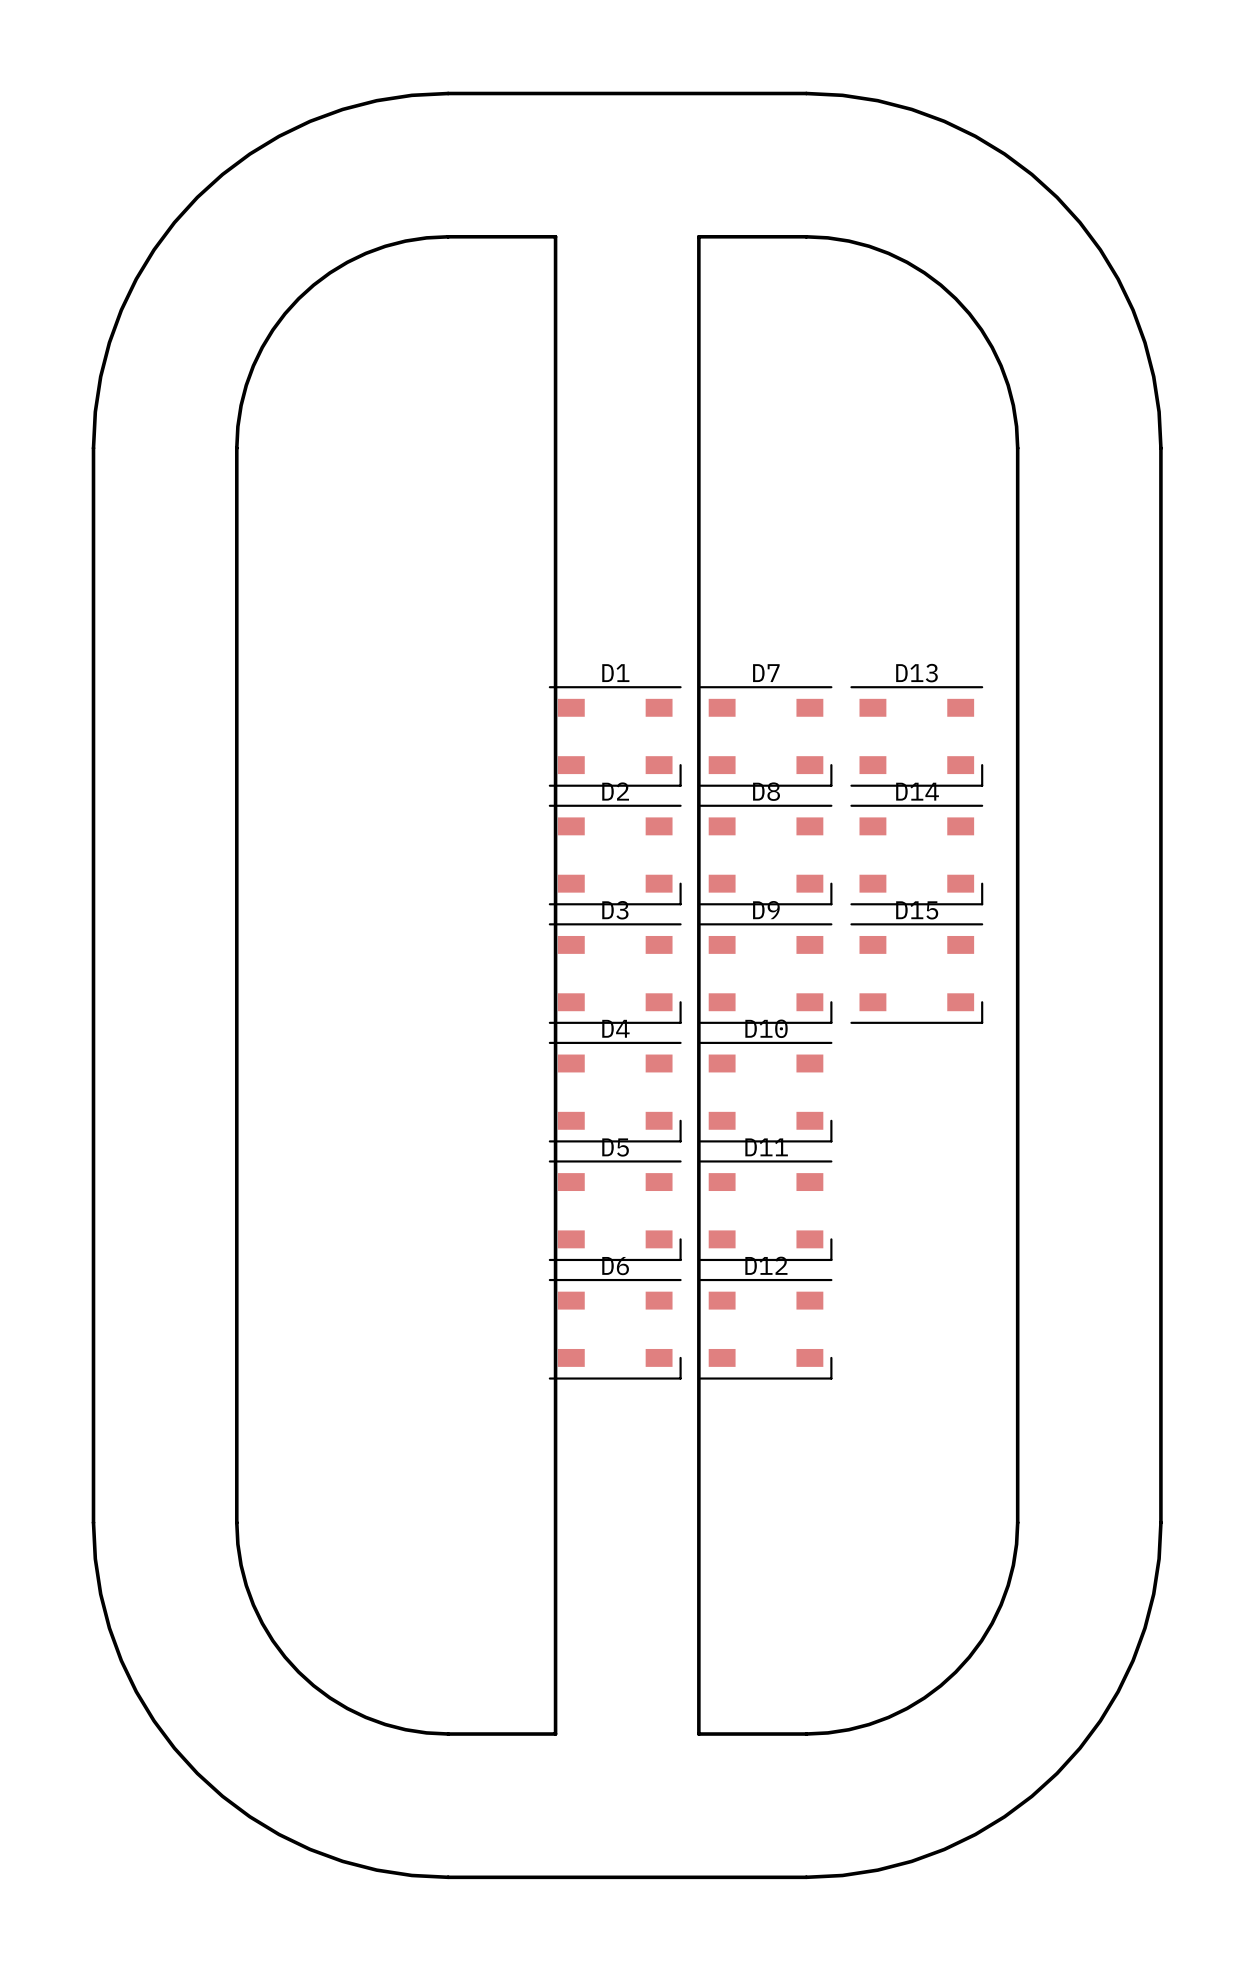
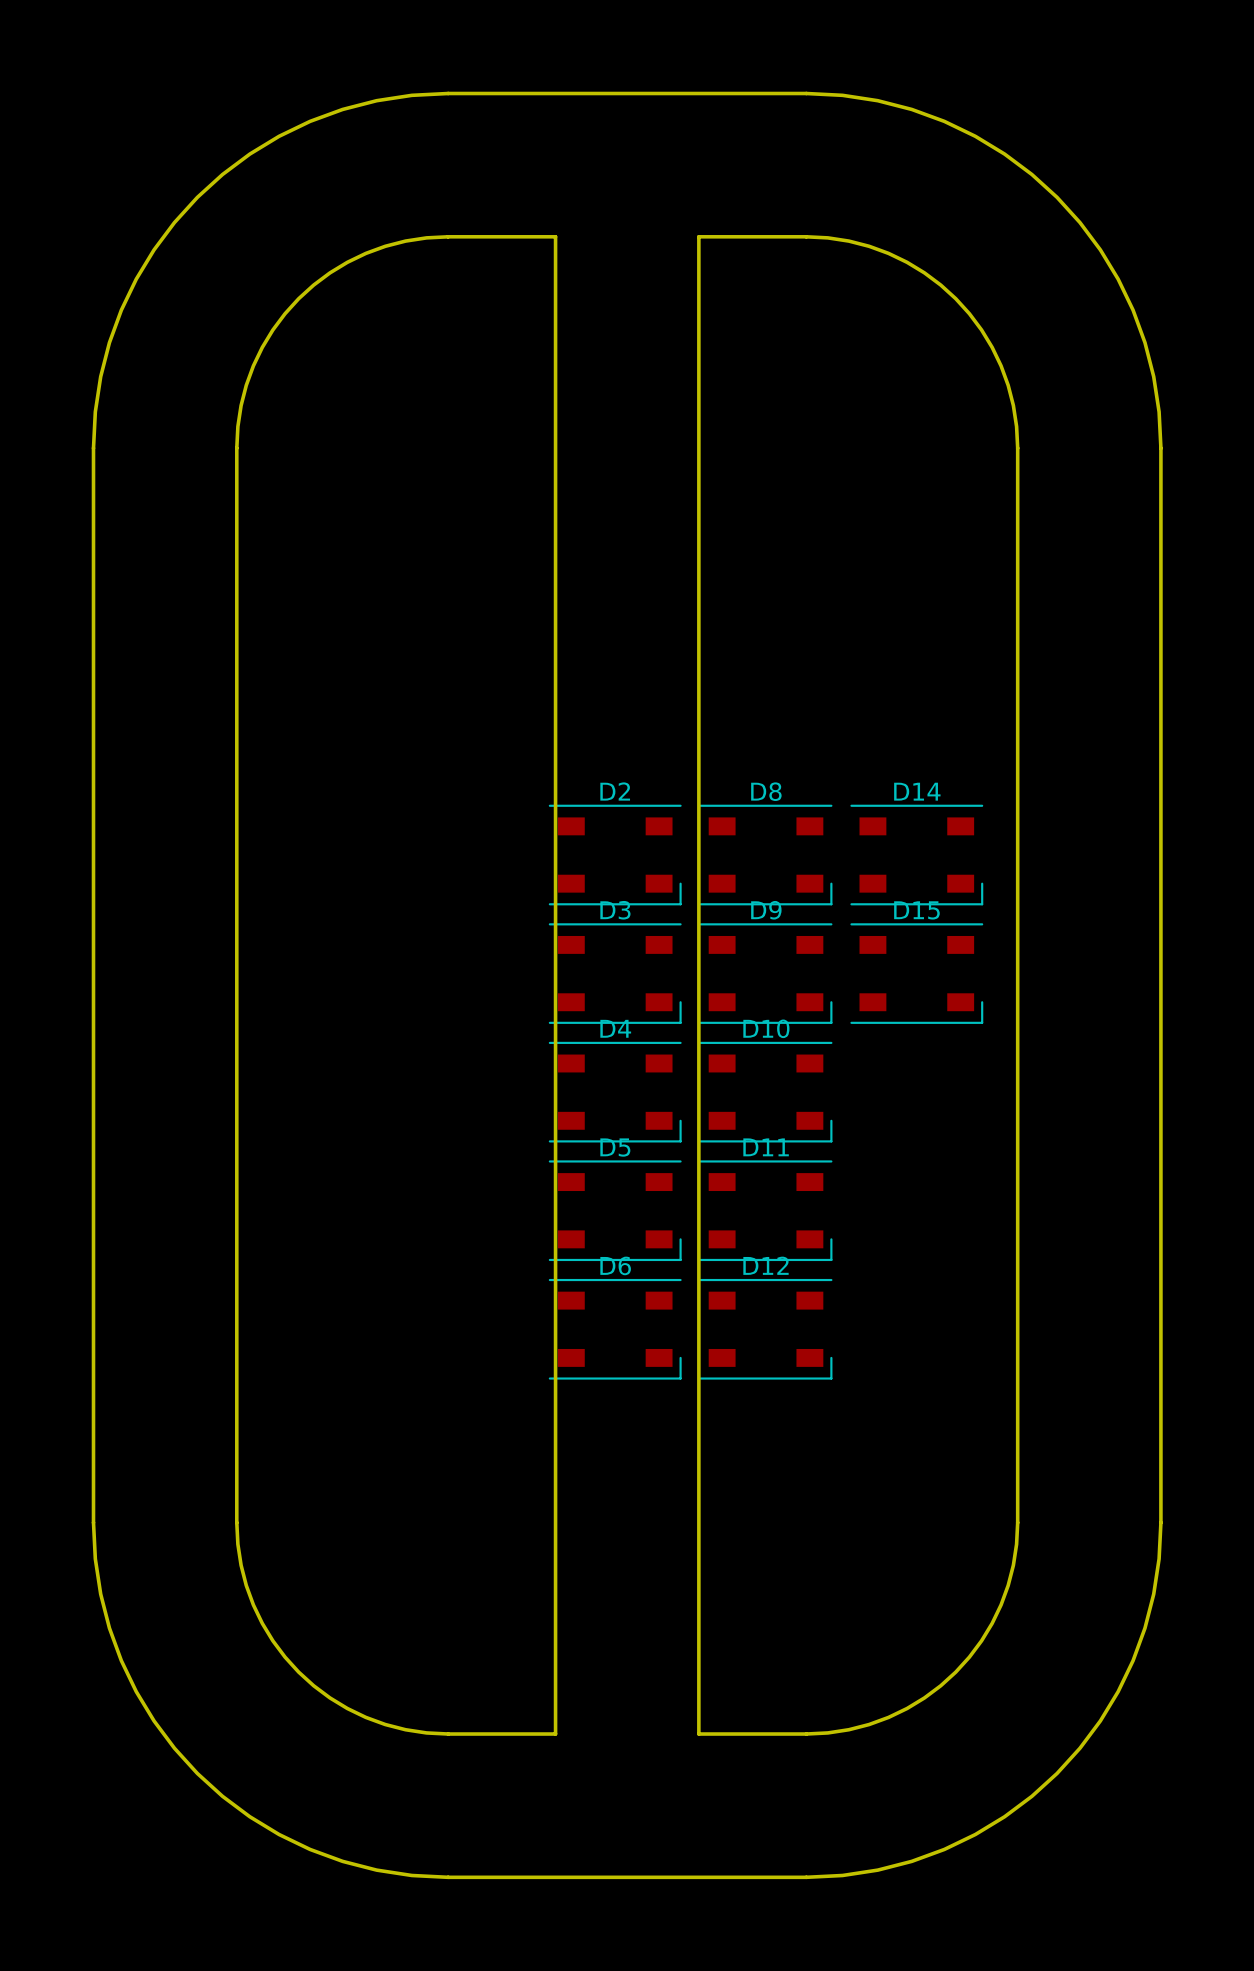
D1: (615, 736) -> none
D7: (766, 736) -> none
D13: (916, 736) -> none

